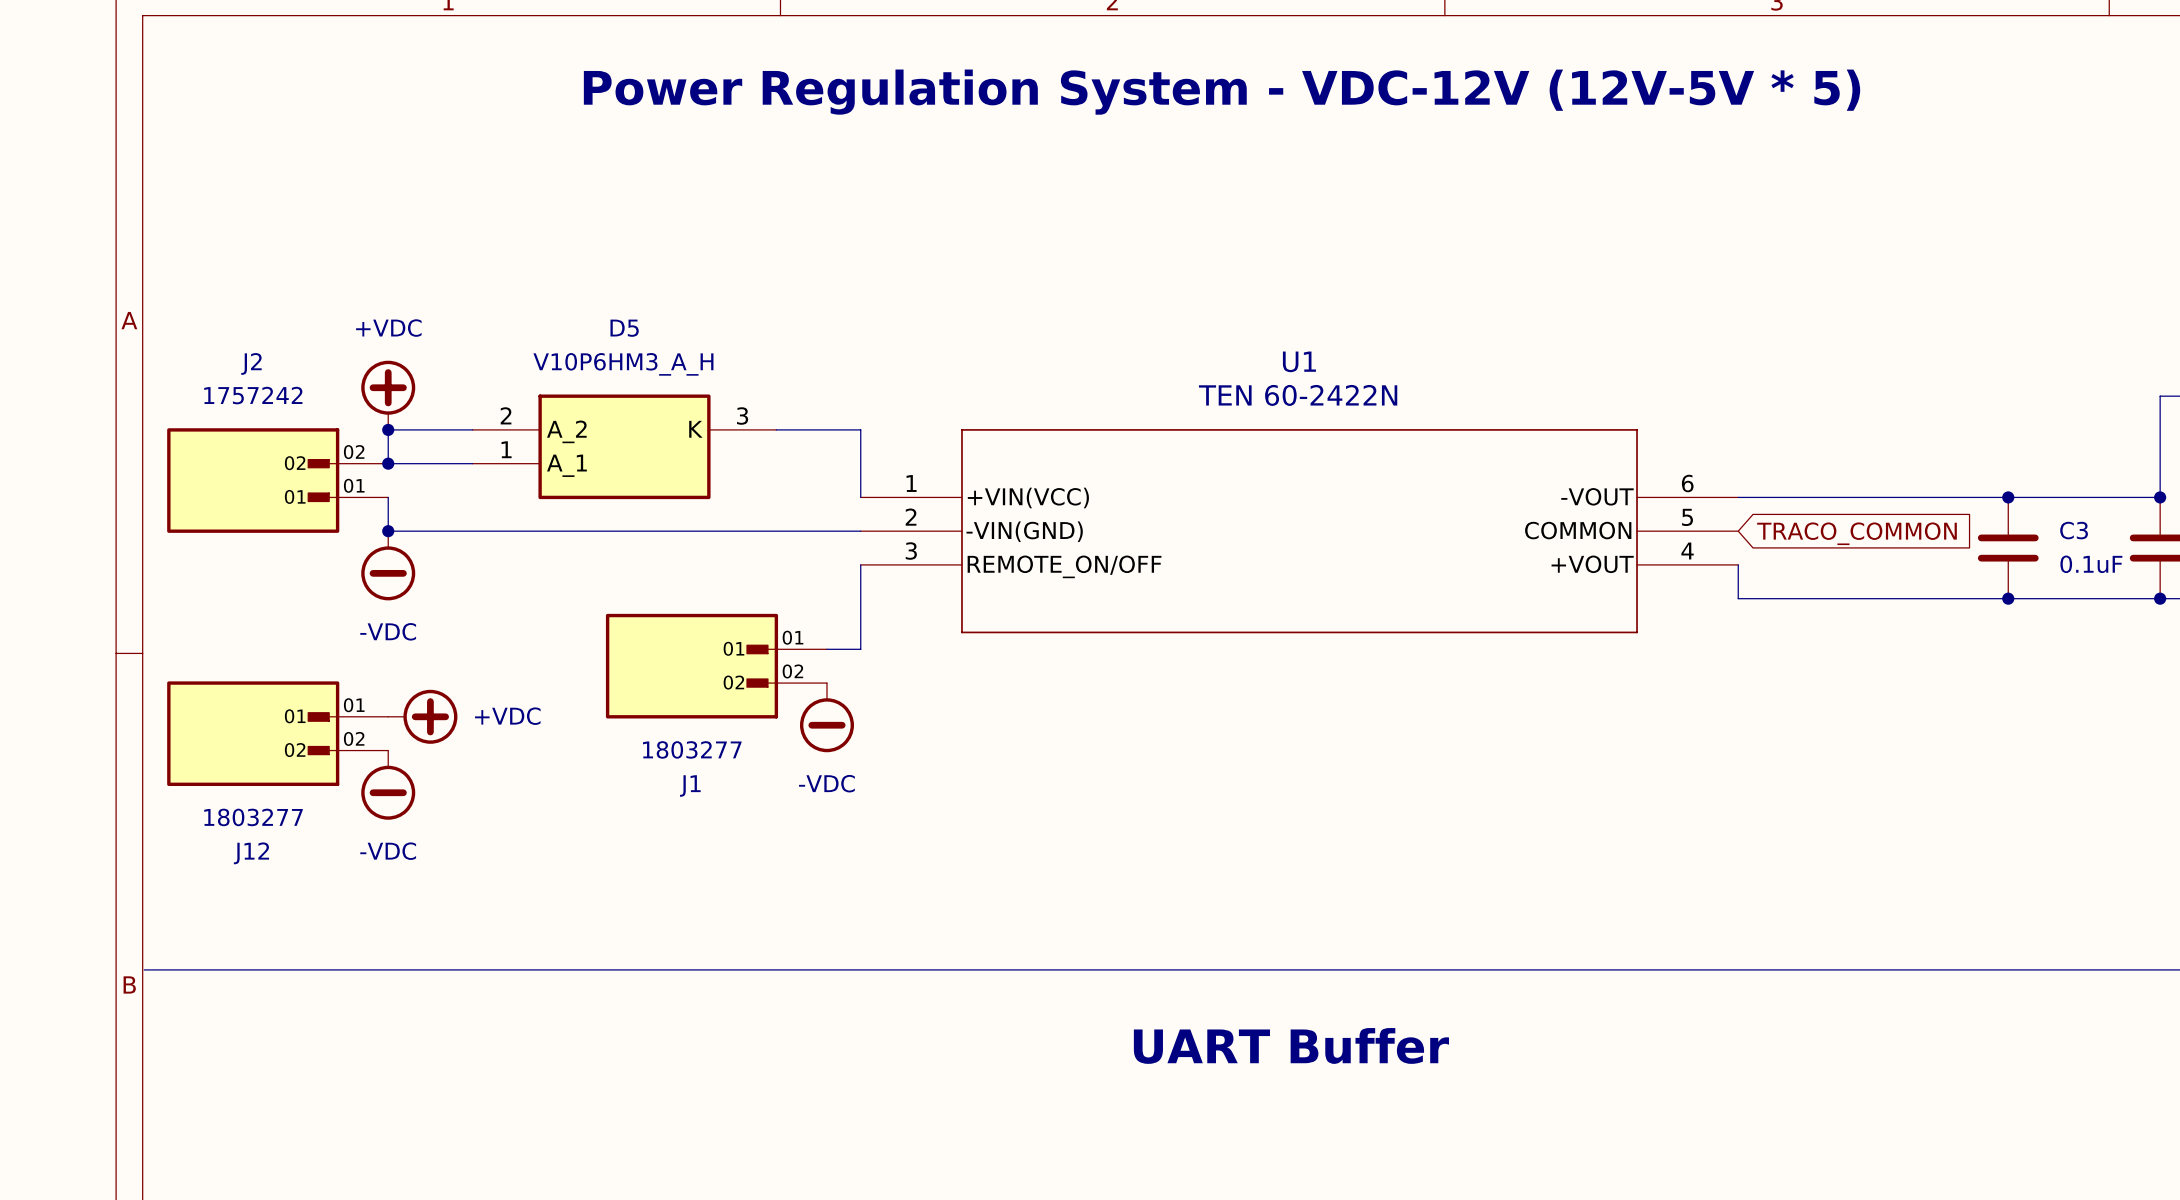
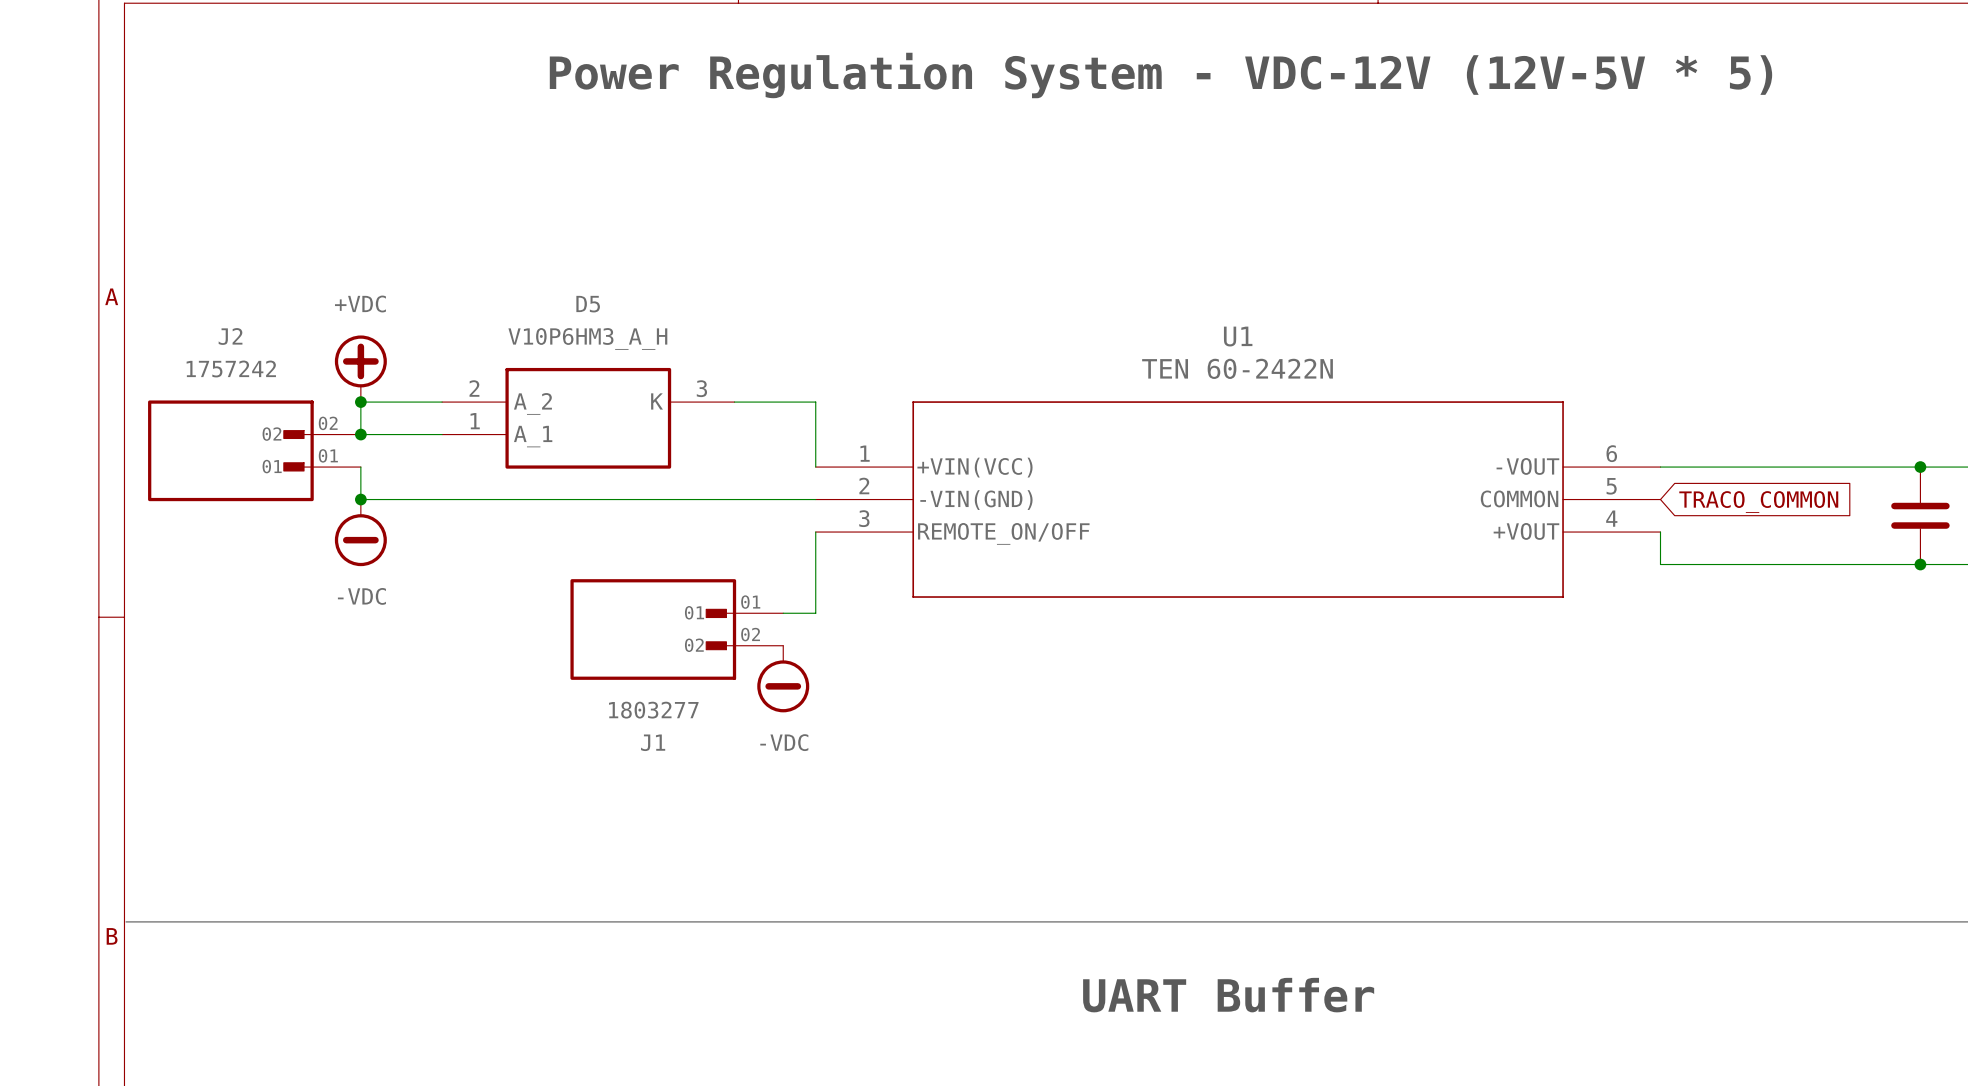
power symbol: +VDC (422, 716) -> none
J12: 1803277 (277, 733) -> none
power symbol: -VDC (388, 785) -> none

